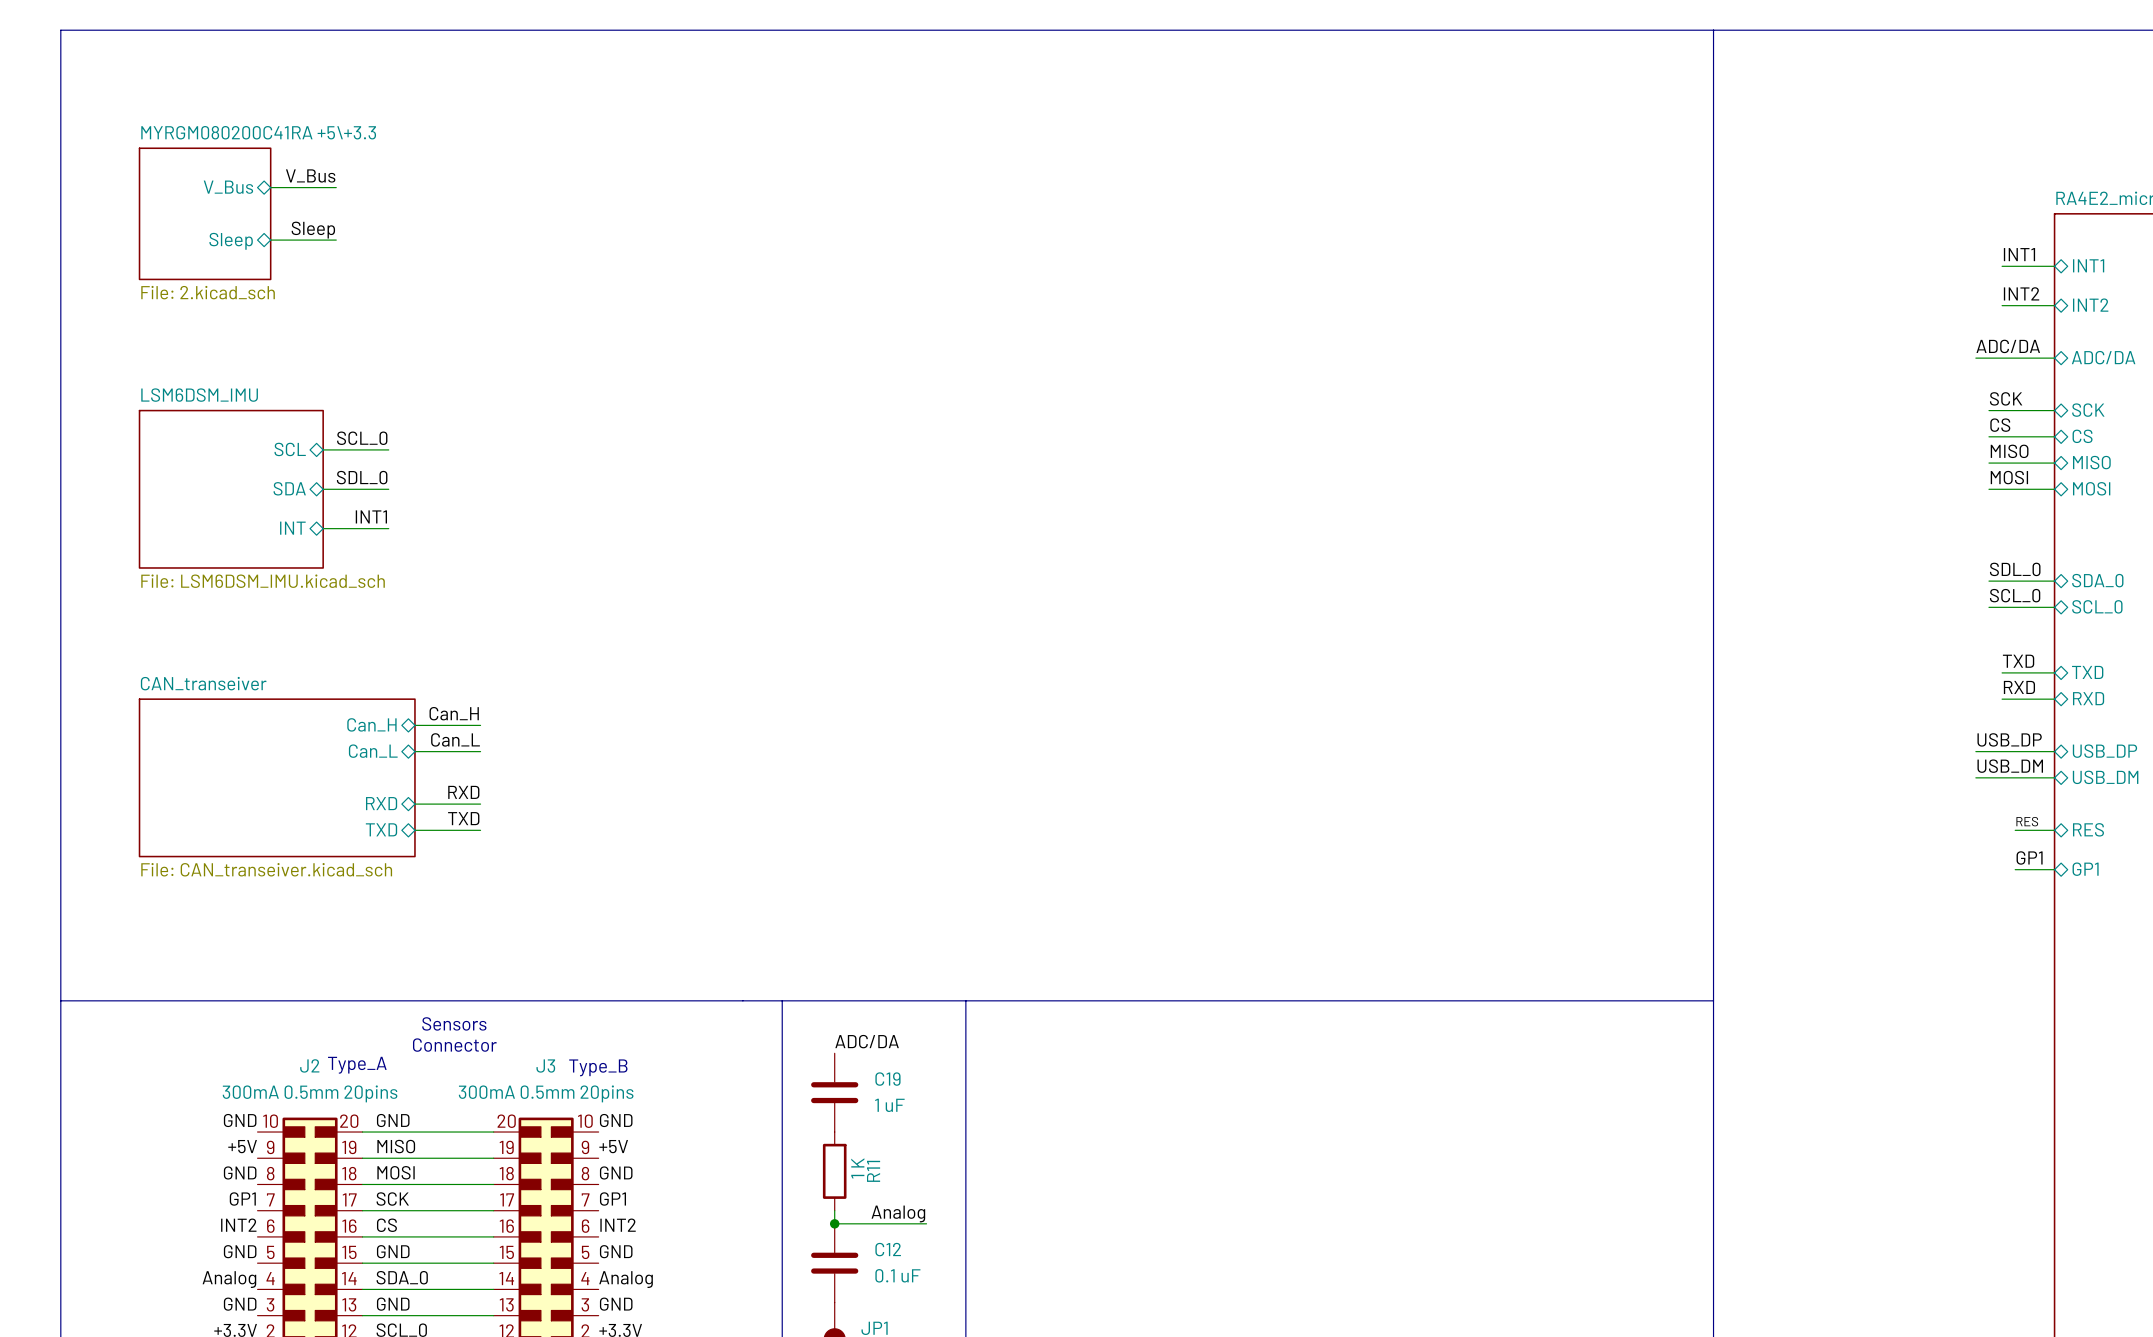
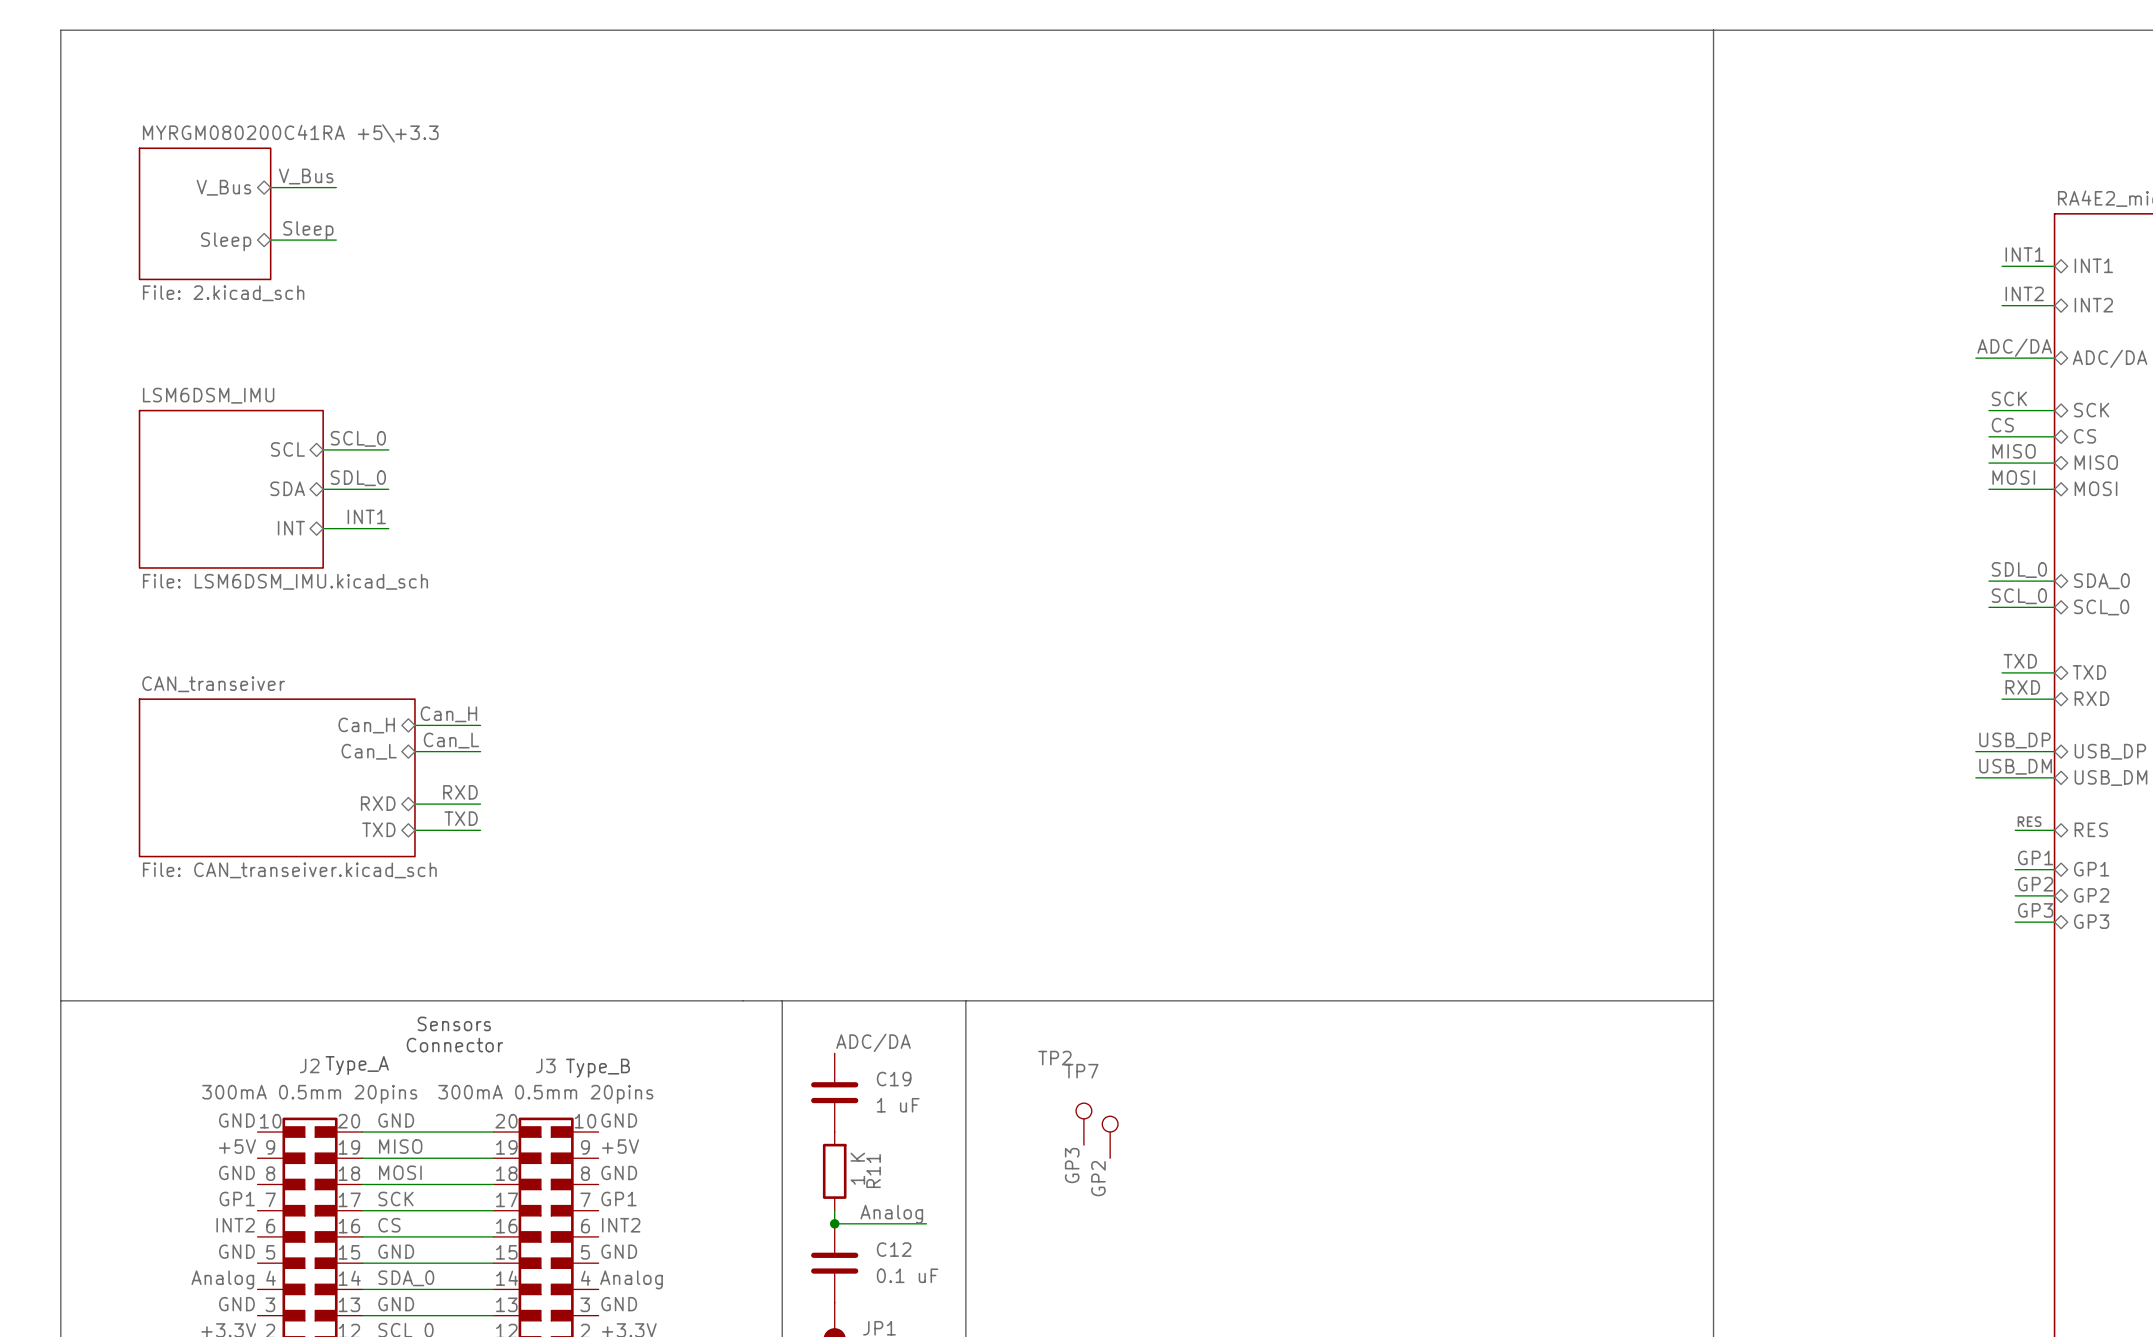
label: none -> GP2 (2035, 884)
wire: none -> (2015, 895) (2054, 895)
sheet pin: none -> GP2 (2091, 895)
label: none -> GP3 (2035, 910)
sheet pin: none -> GP3 (2091, 921)
wire: none -> (2015, 922) (2054, 922)
TP2: none -> (1083, 1124)
TP7: none -> (1110, 1137)
label: none -> GP3 (1072, 1165)
label: none -> GP2 (1098, 1178)

